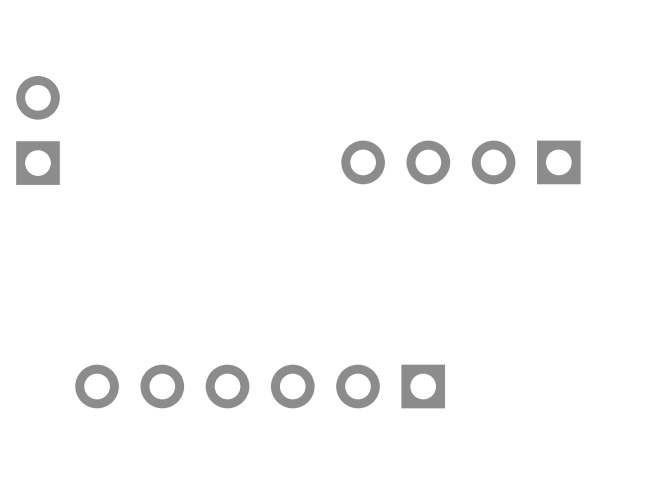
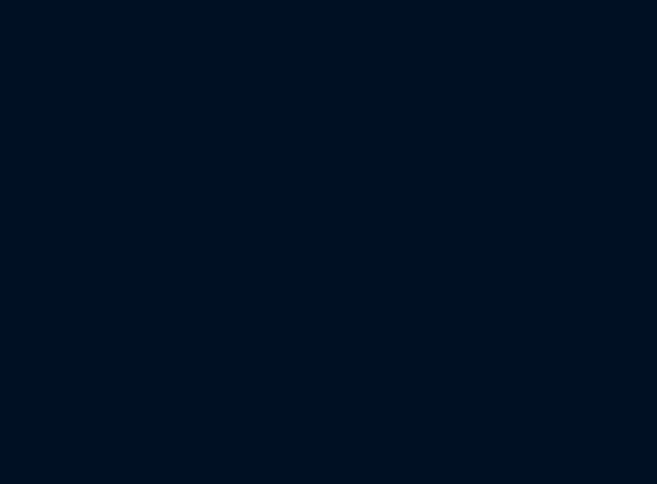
part: (37, 130) -> none
part: (460, 162) -> none
part: (260, 386) -> none

